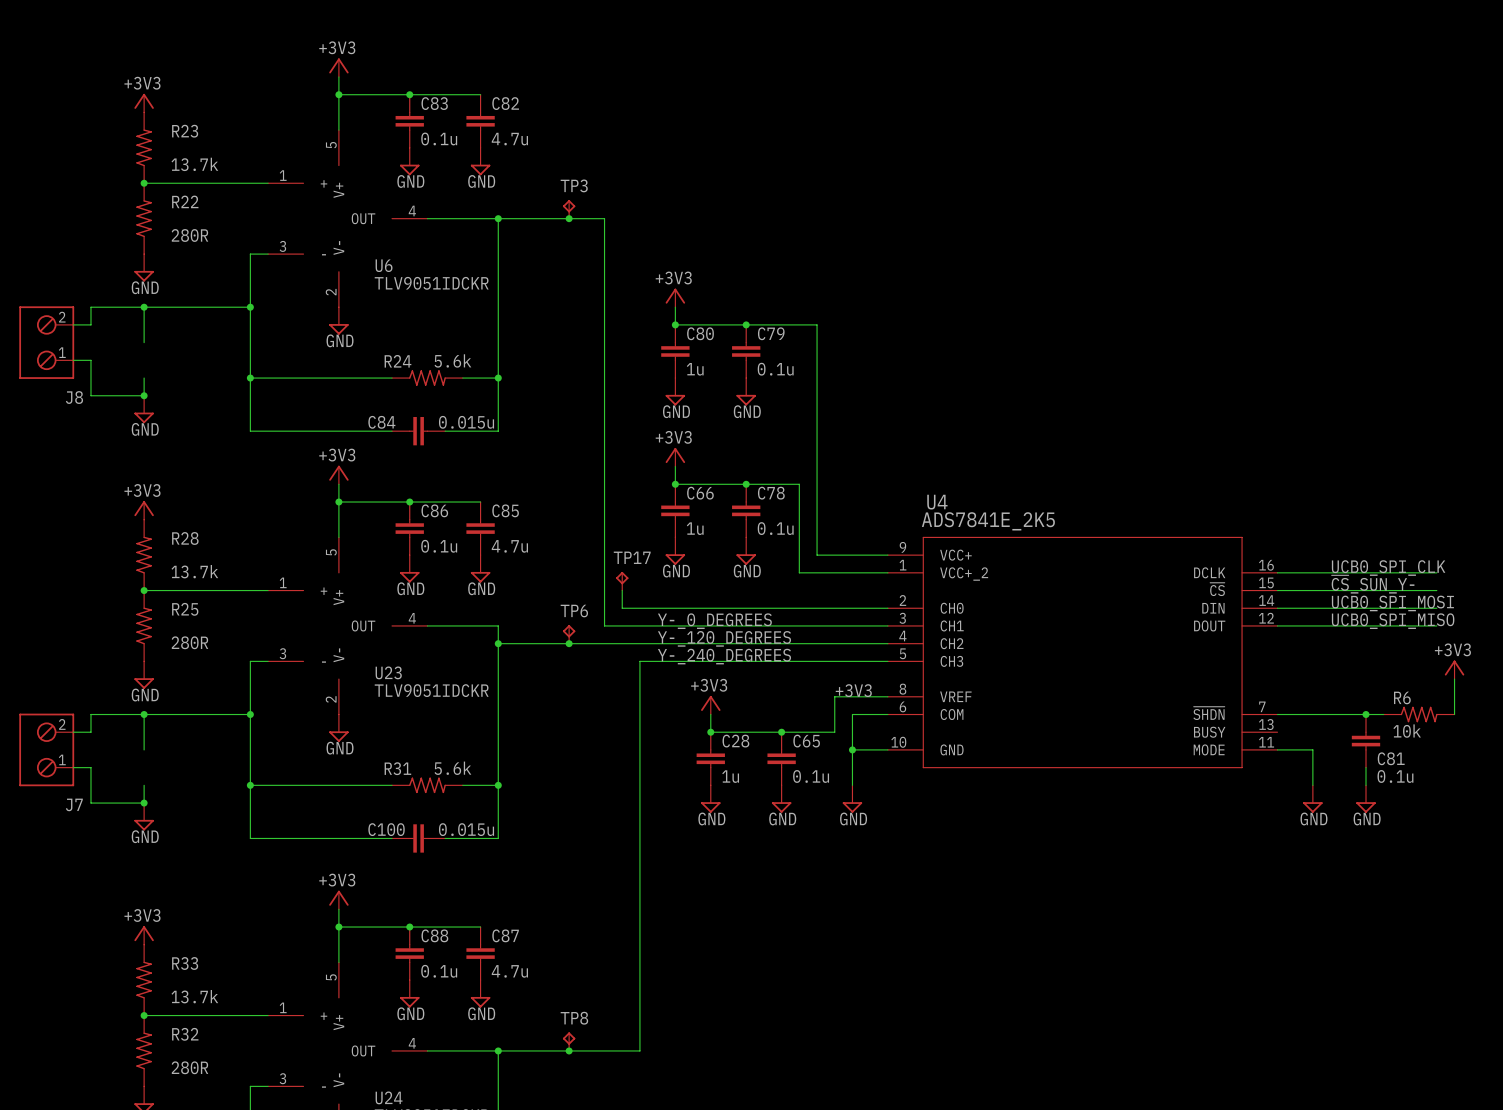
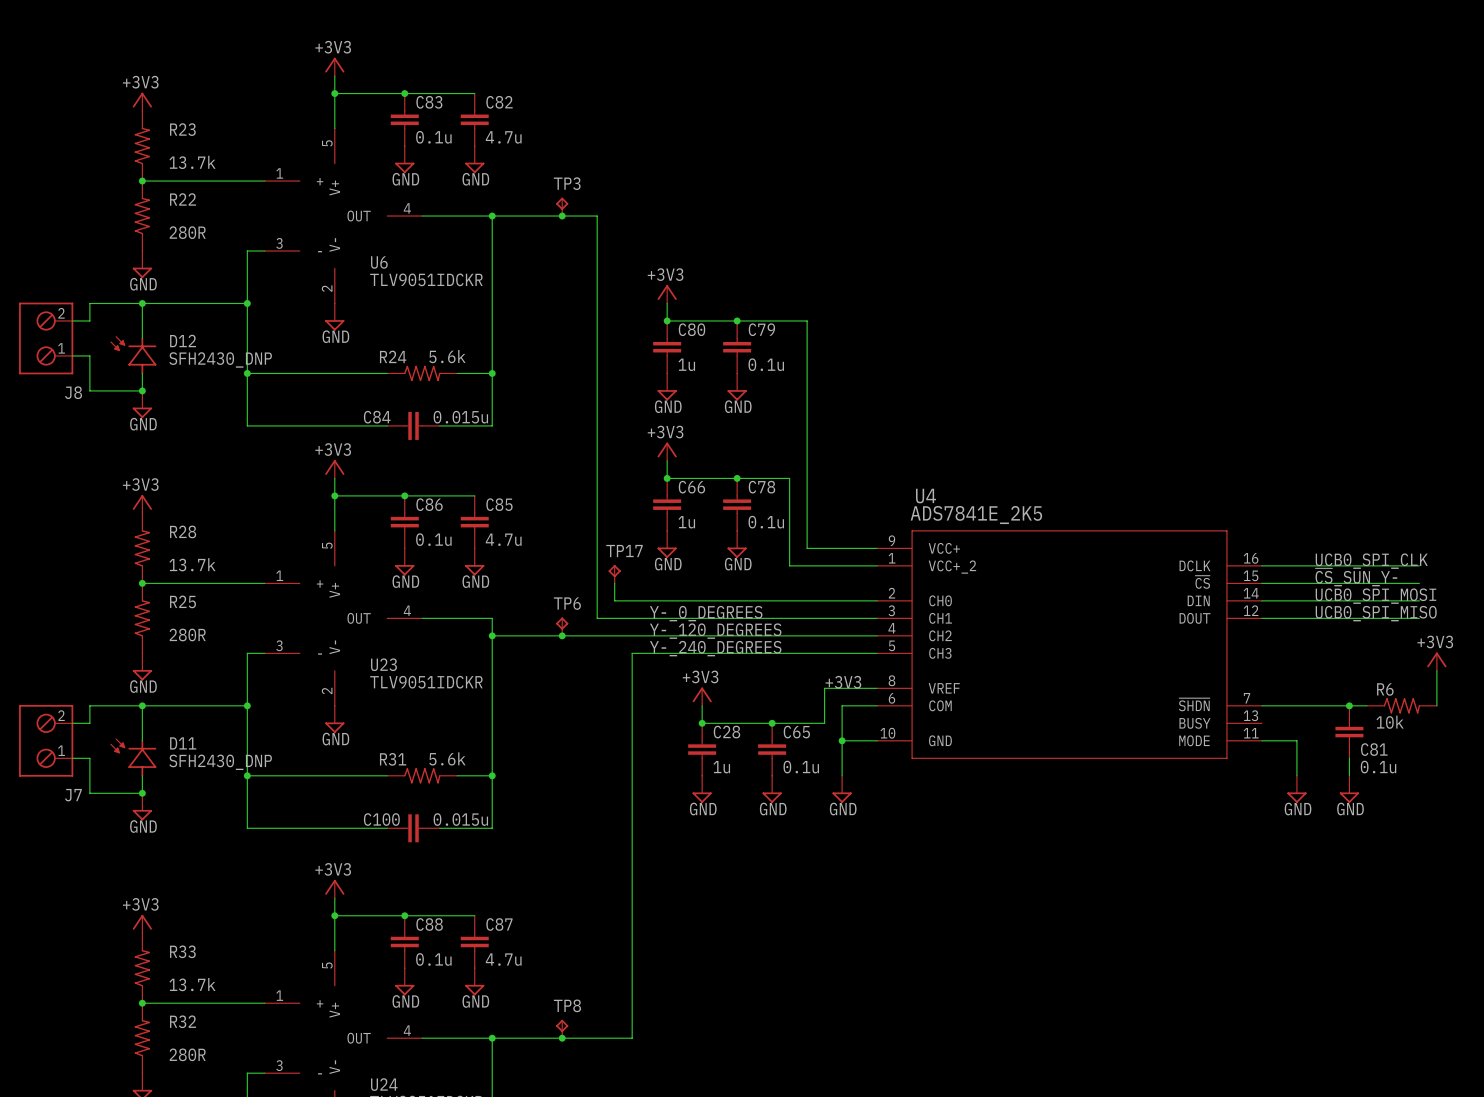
D12: none -> SFH2430_DNP (133, 355)
D11: none -> SFH2430_DNP (133, 757)

